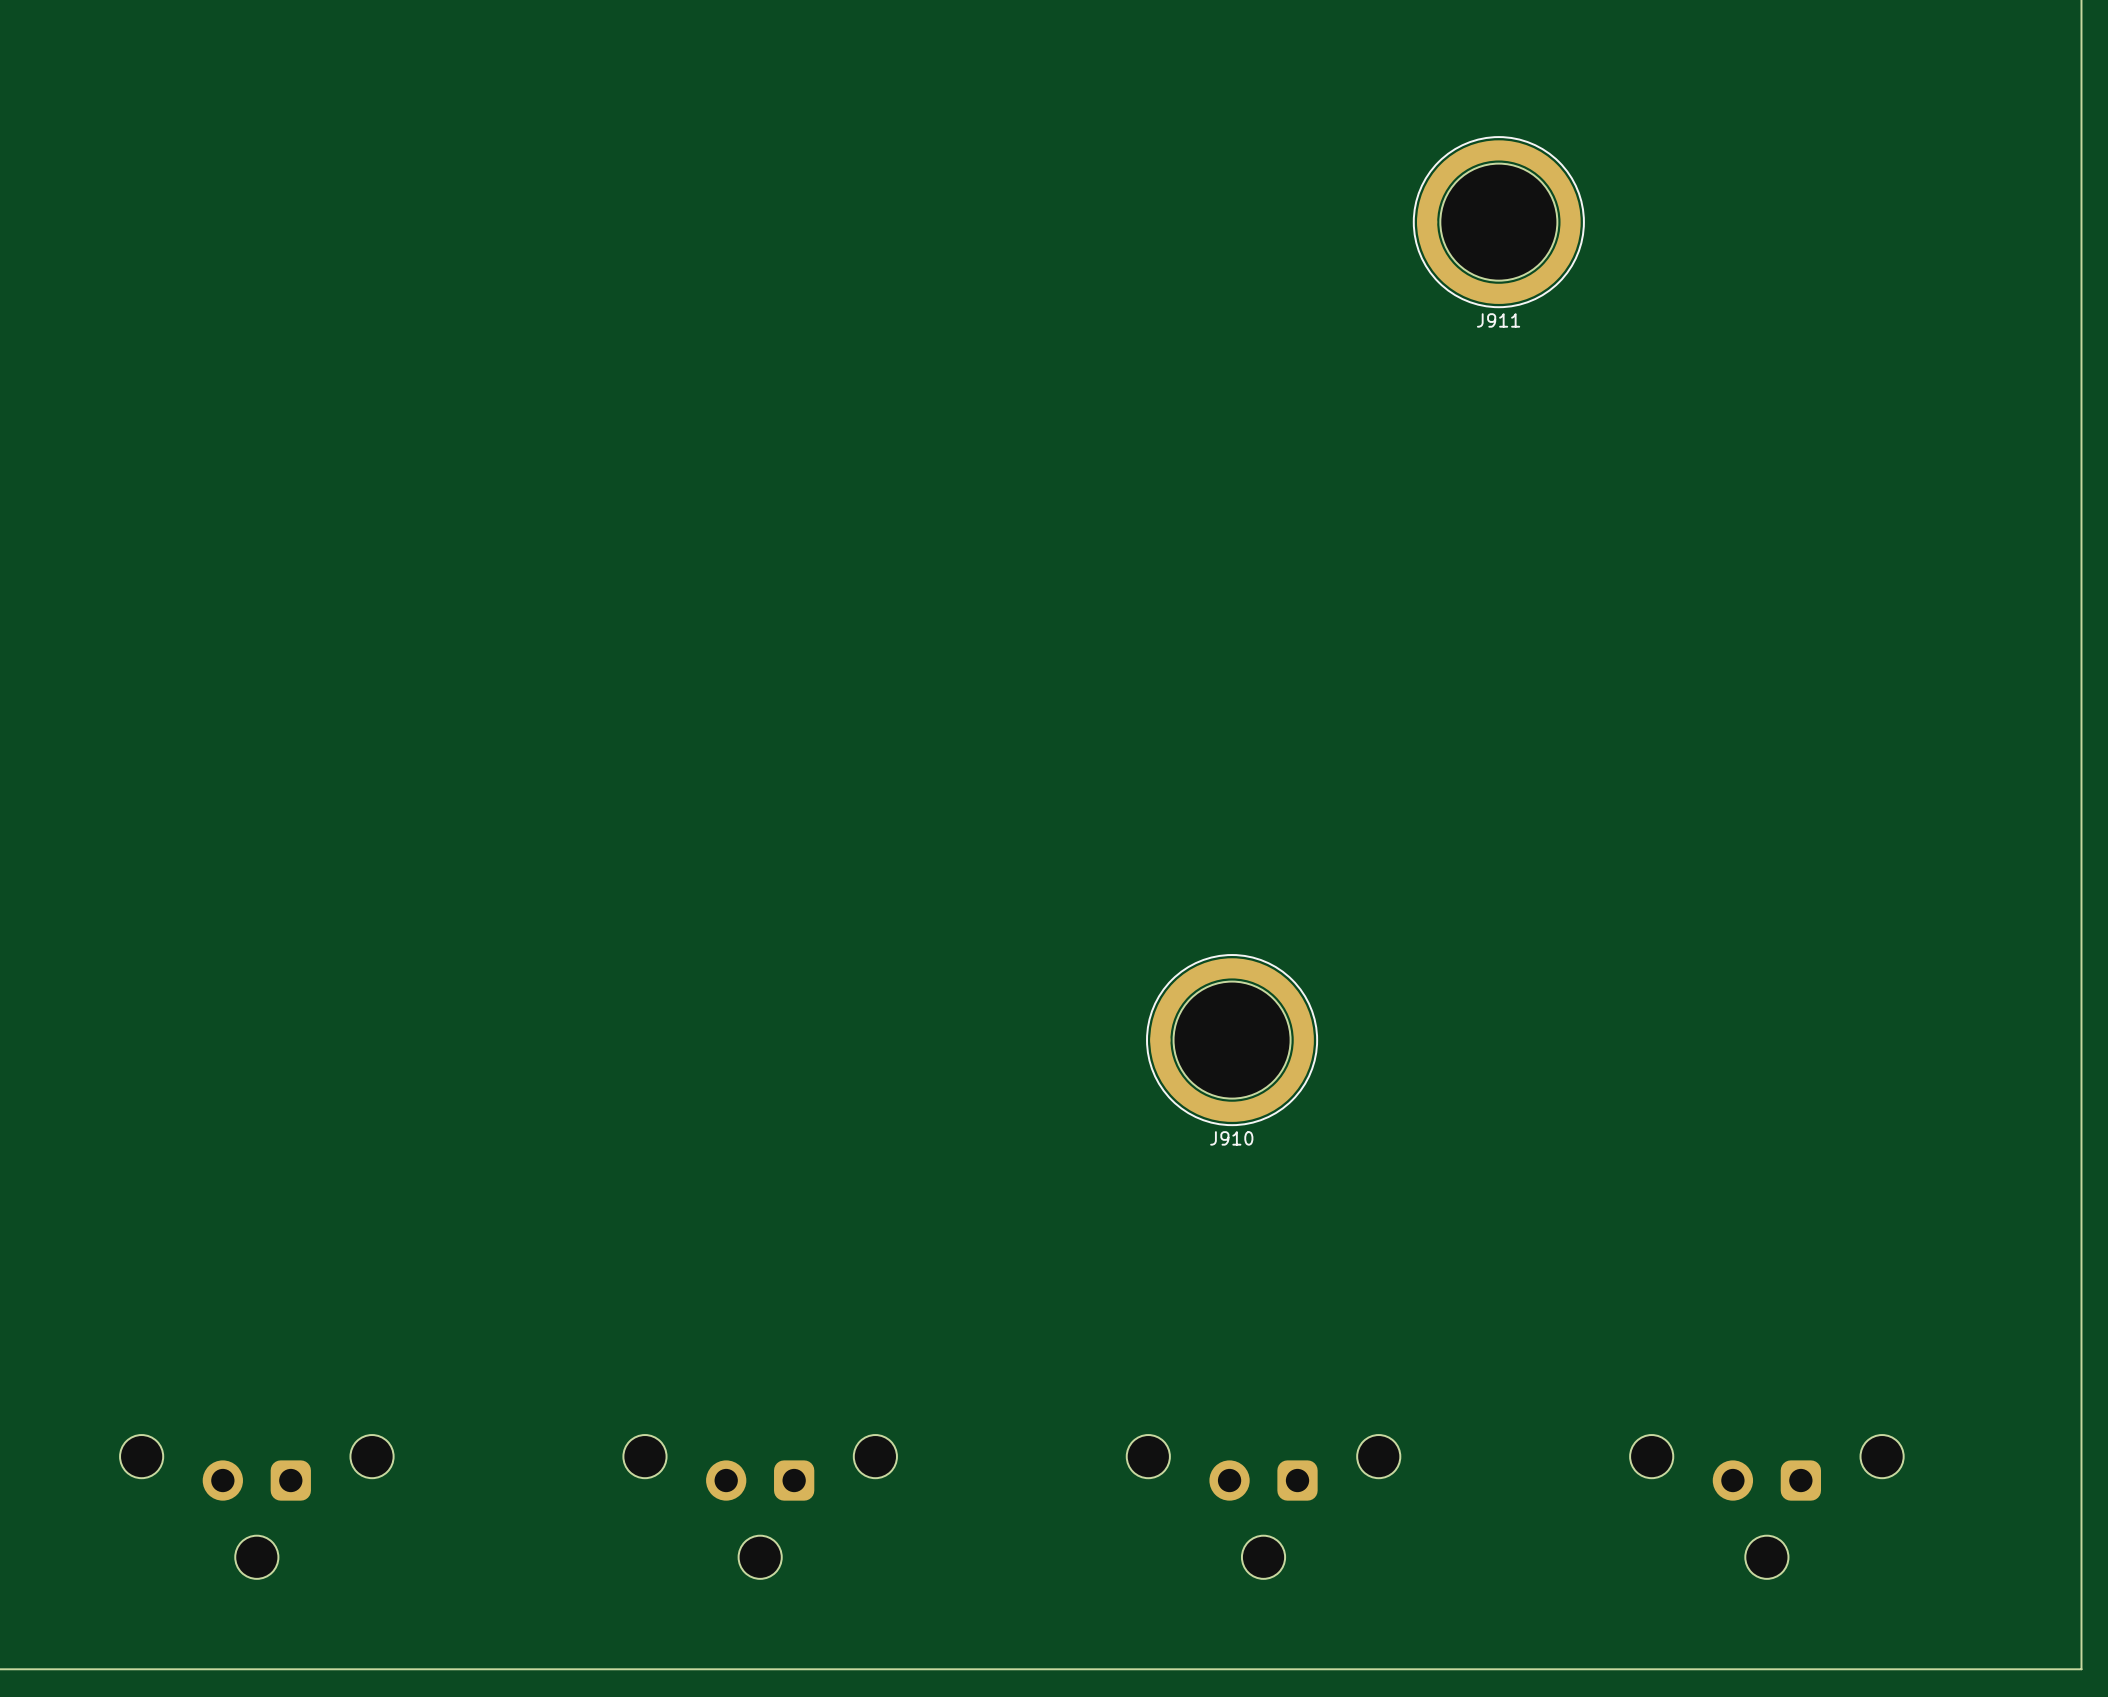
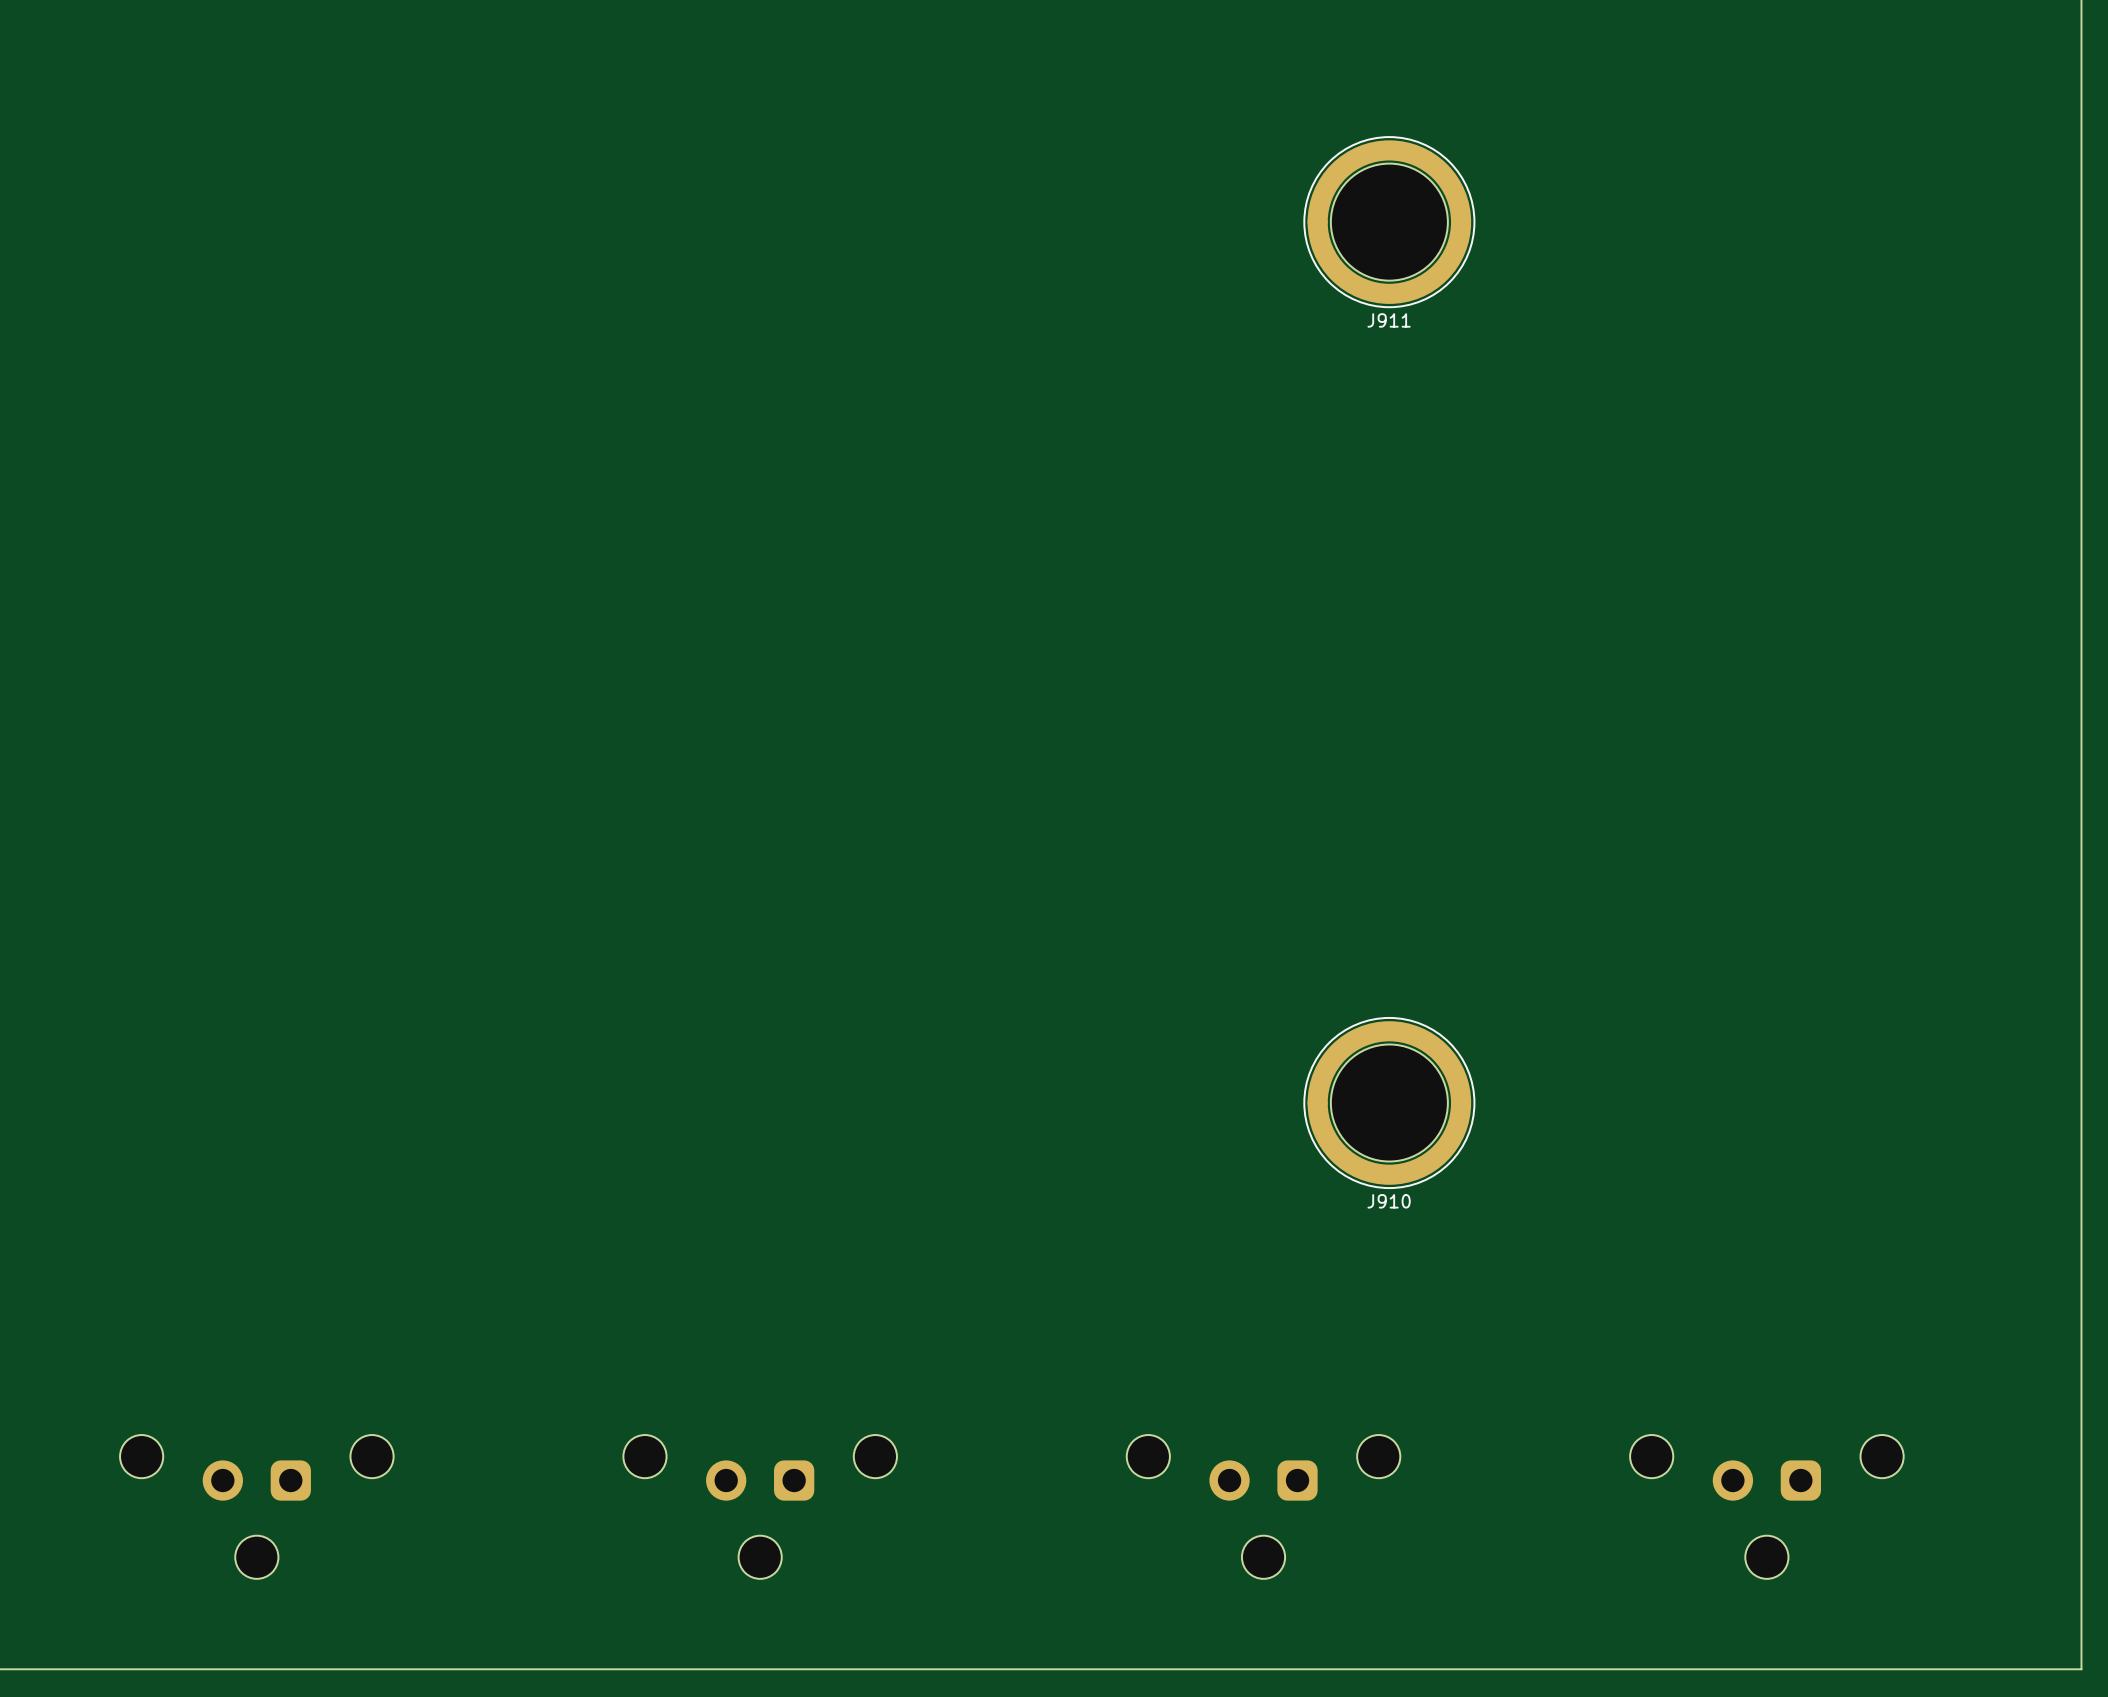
J911 position: (1498, 222) -> (1389, 222)
J910 position: (1232, 1040) -> (1389, 1103)

